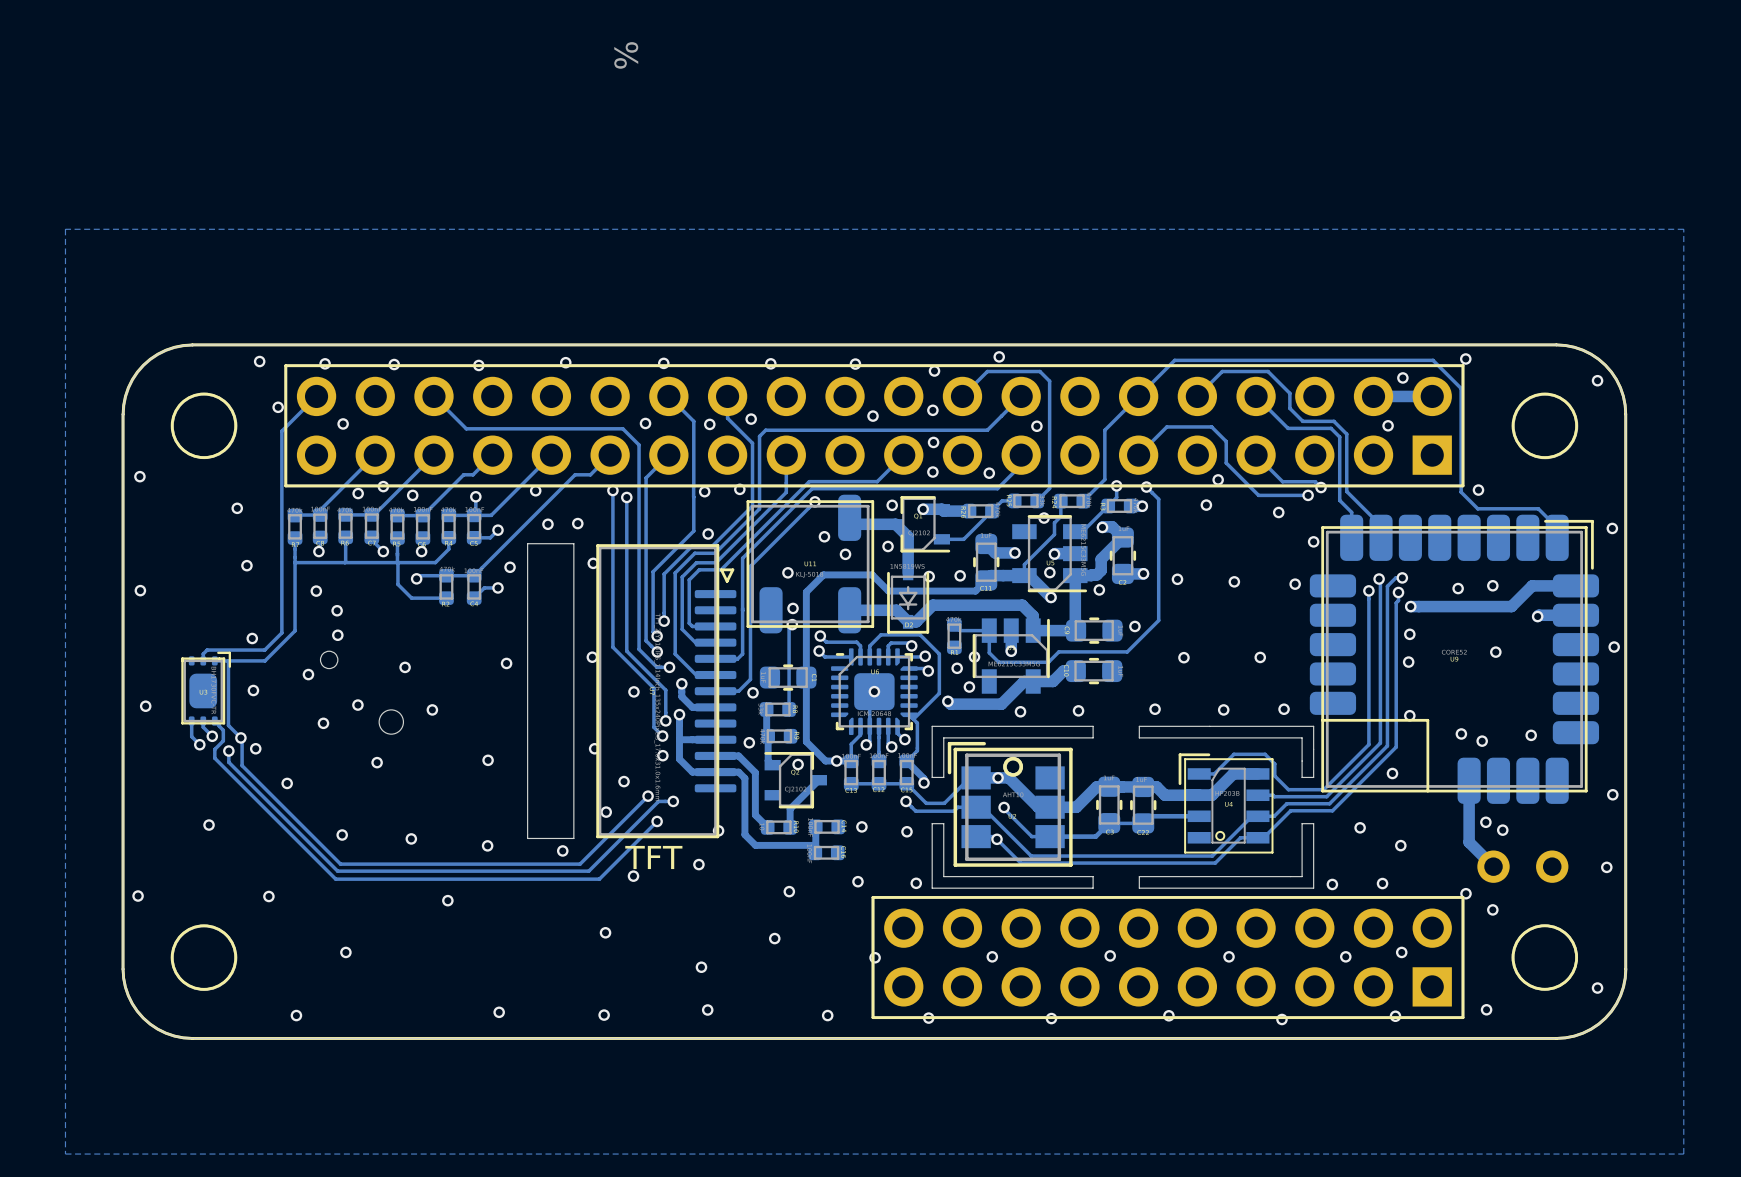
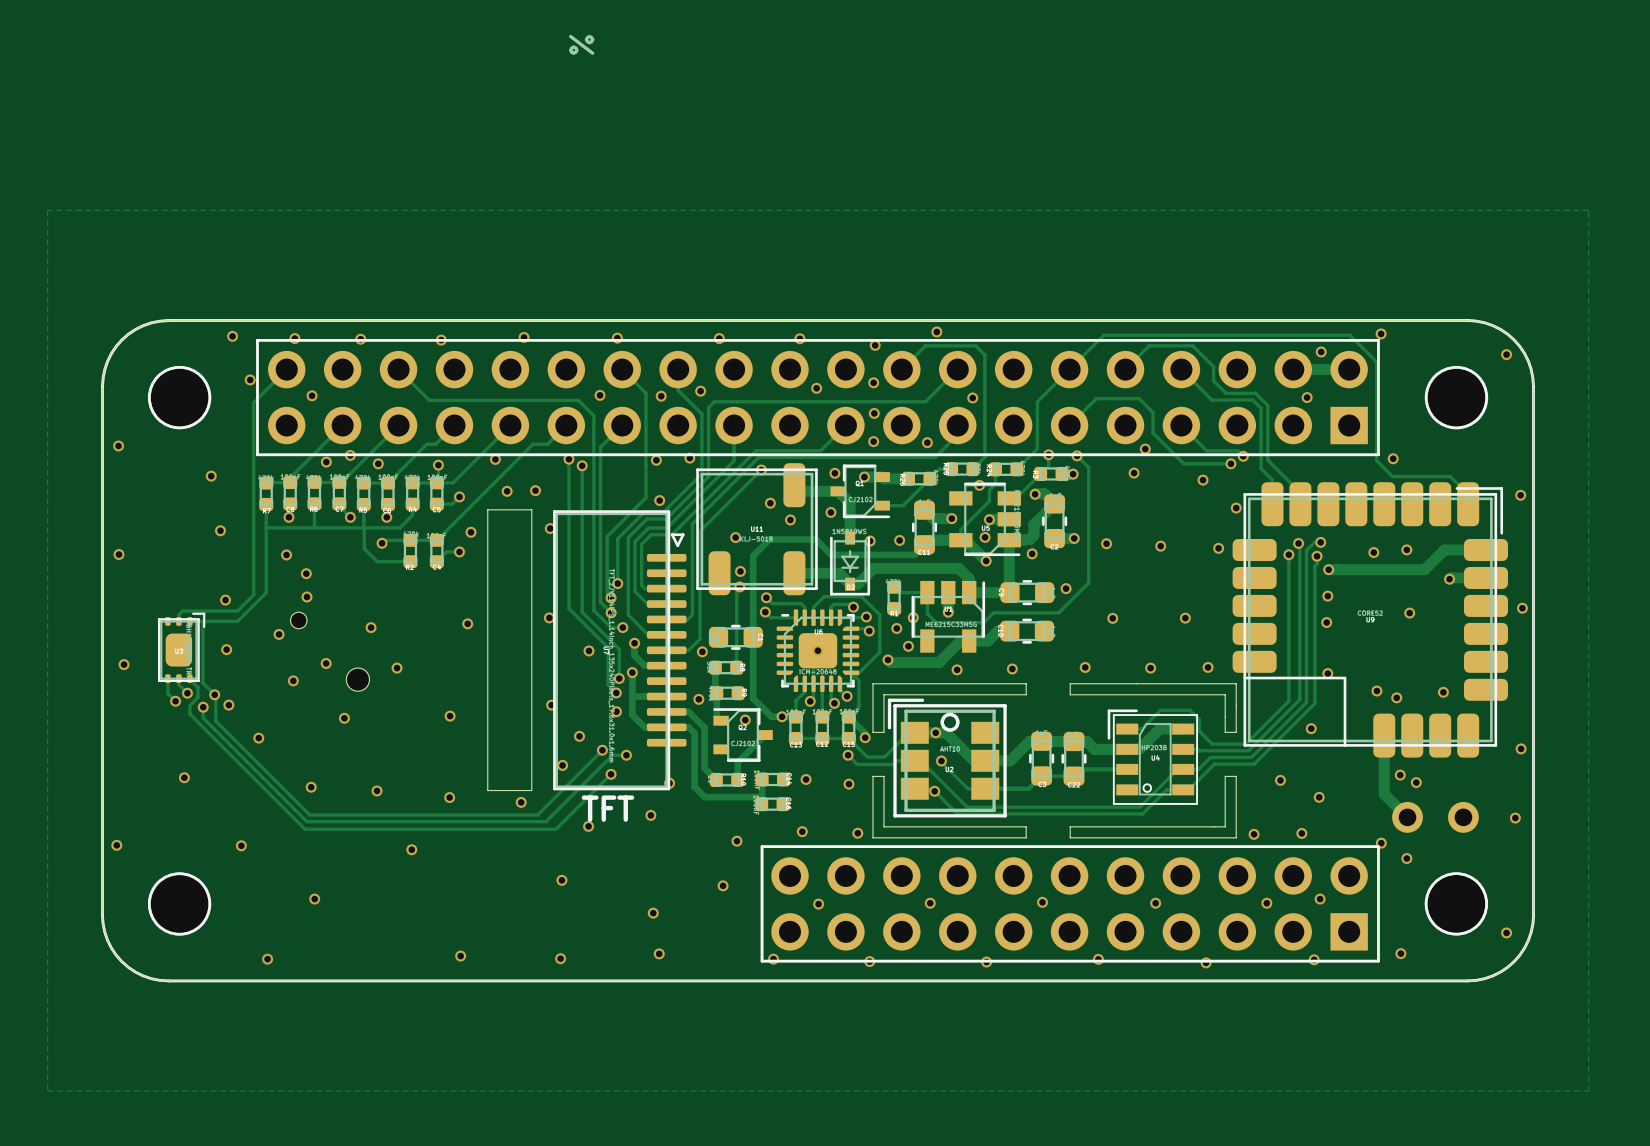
part footprint: [121, 343, 1628, 1040] -> [101, 319, 1535, 983]

